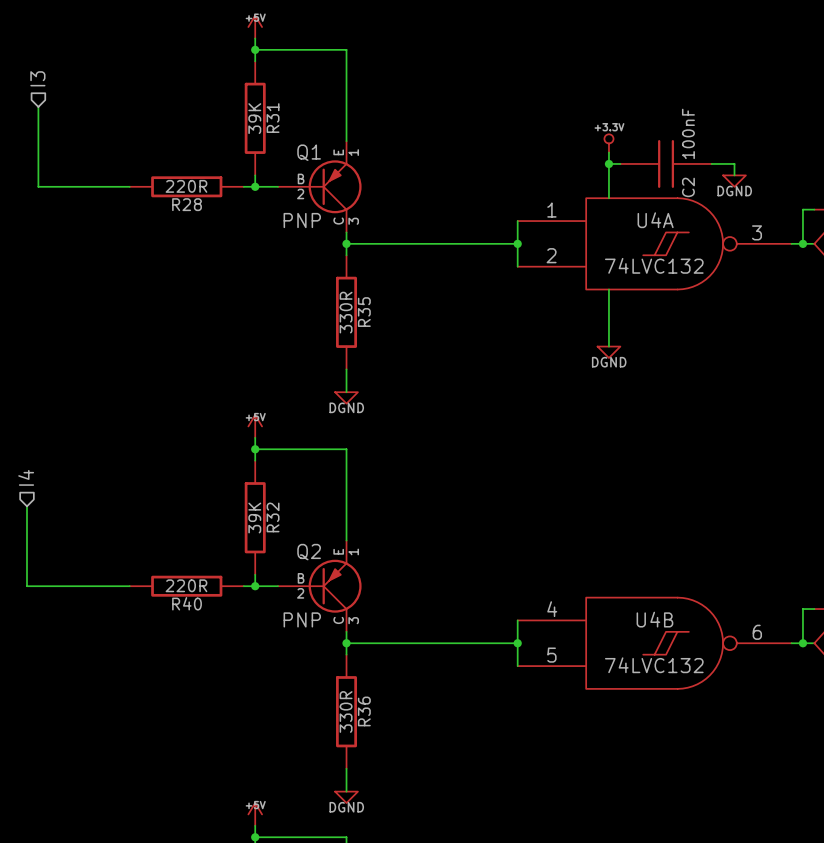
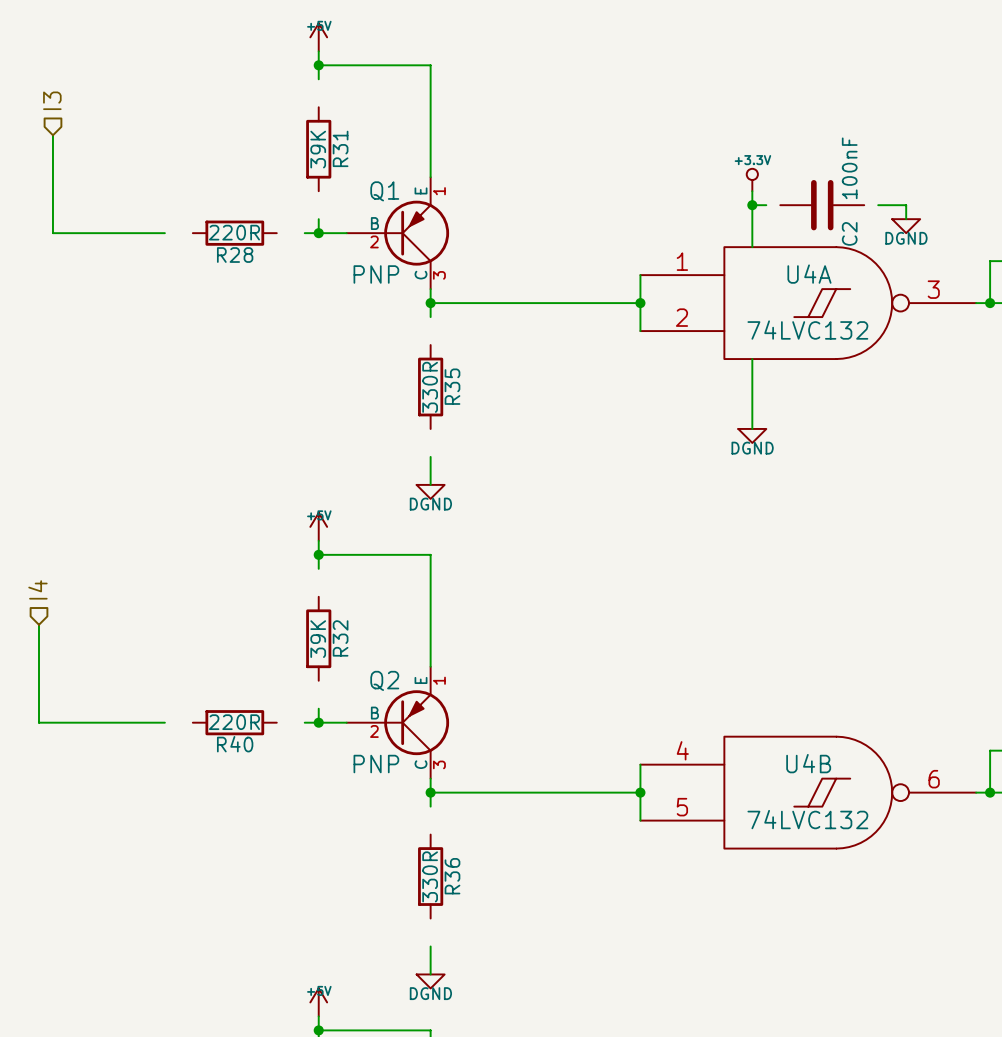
R31 symbol: [244, 61, 266, 176] -> [306, 107, 332, 192]
C2 symbol: [620, 140, 712, 188] -> [780, 180, 865, 231]
R28 symbol: [129, 176, 244, 198] -> [192, 220, 277, 246]
R35 symbol: [336, 255, 358, 370] -> [418, 345, 444, 429]
R32 symbol: [244, 460, 266, 575] -> [306, 596, 332, 681]
R40 symbol: [129, 575, 244, 597] -> [192, 710, 277, 736]
R36 symbol: [336, 654, 358, 769] -> [418, 834, 444, 919]

